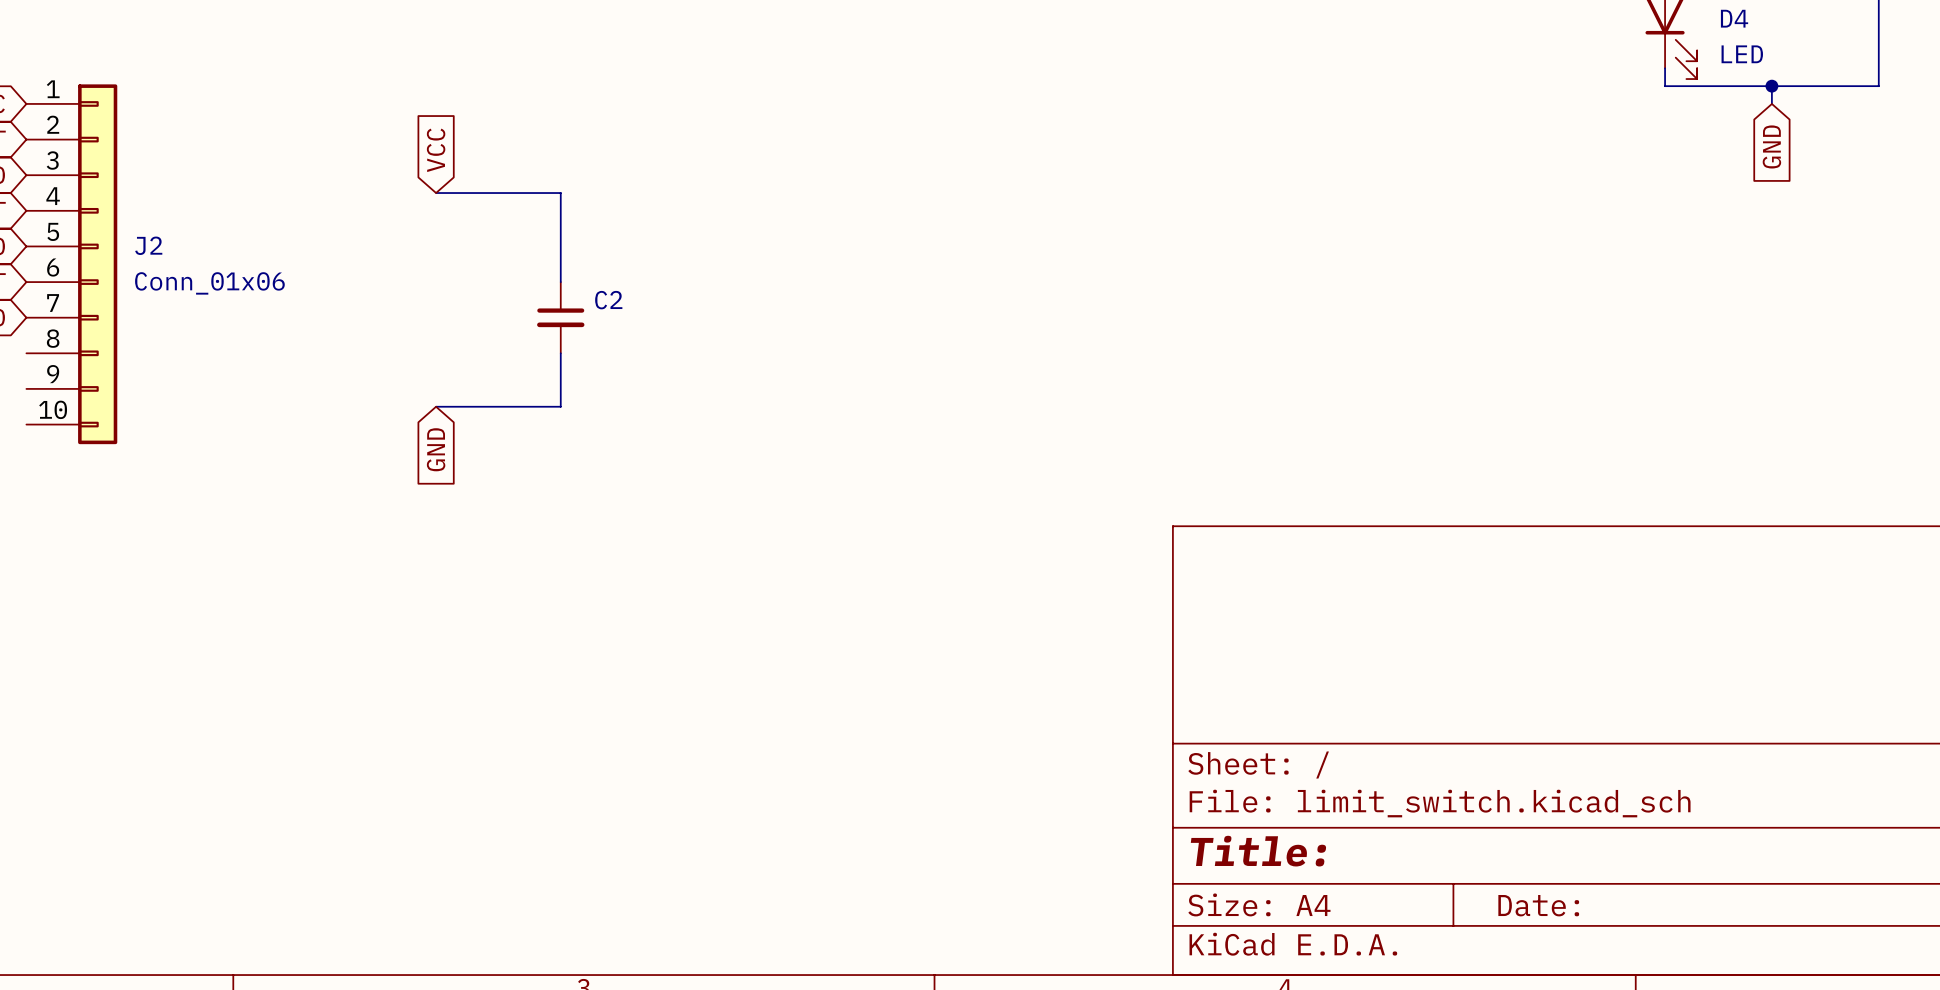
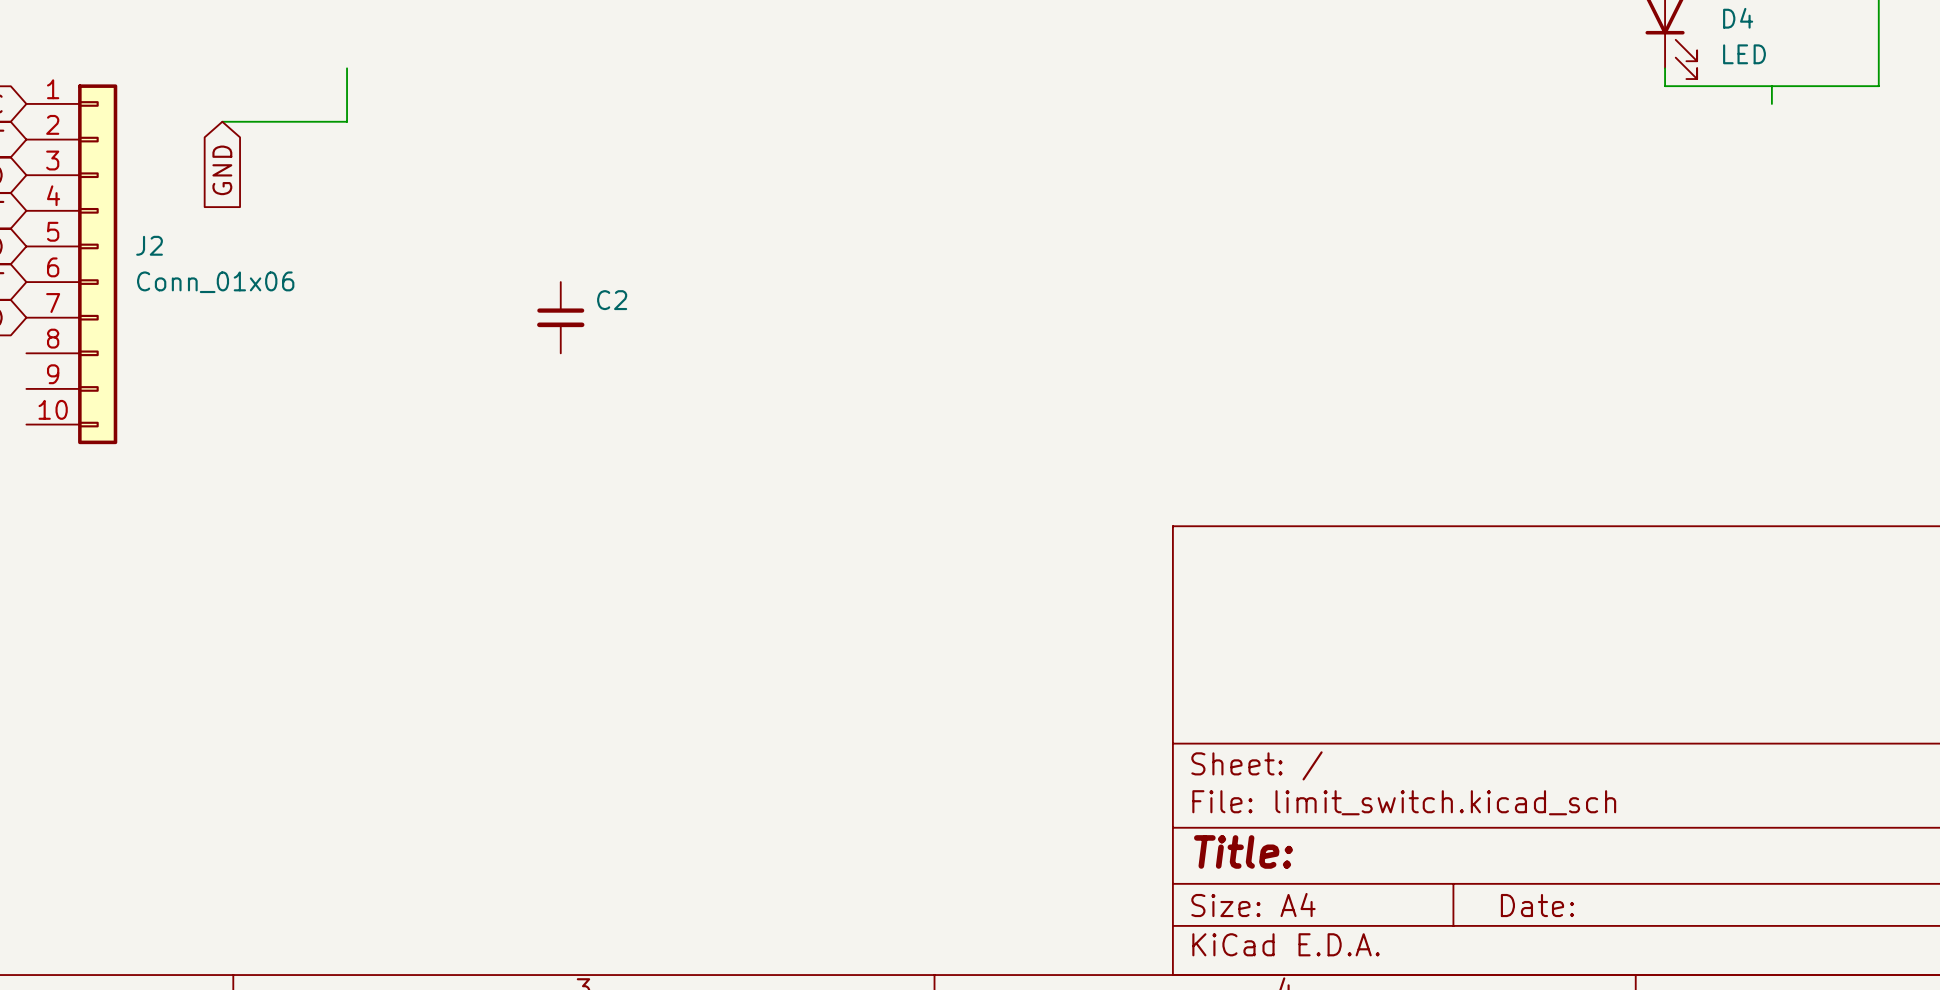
wire: none -> (347, 68) (347, 121) (222, 121)
junction: (1771, 86) -> none
global label: GND (1771, 146) -> none
global label: VCC (436, 150) -> none
global label: none -> GND (222, 170)
wire: (436, 193) (560, 193) (560, 282) -> none
wire: (560, 353) (560, 406) (436, 406) -> none
global label: GND (436, 449) -> none

